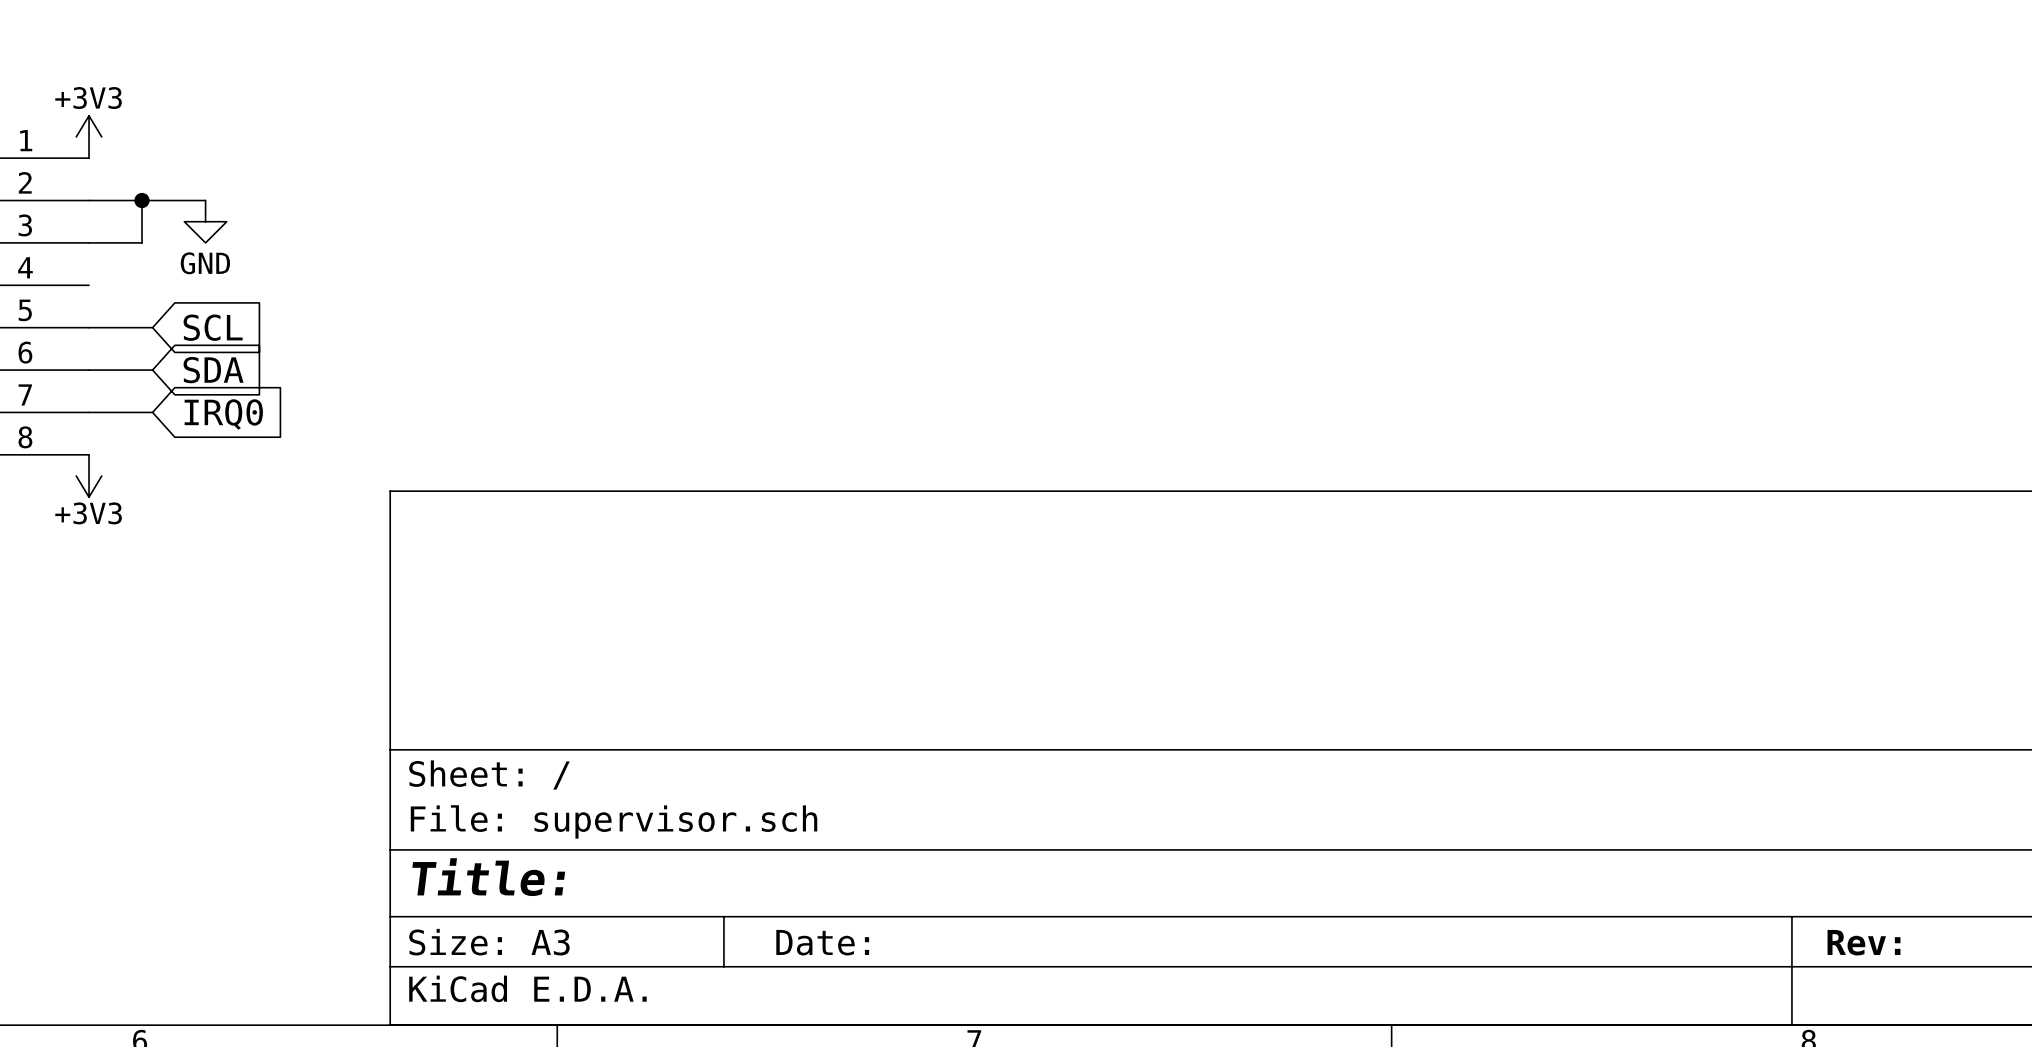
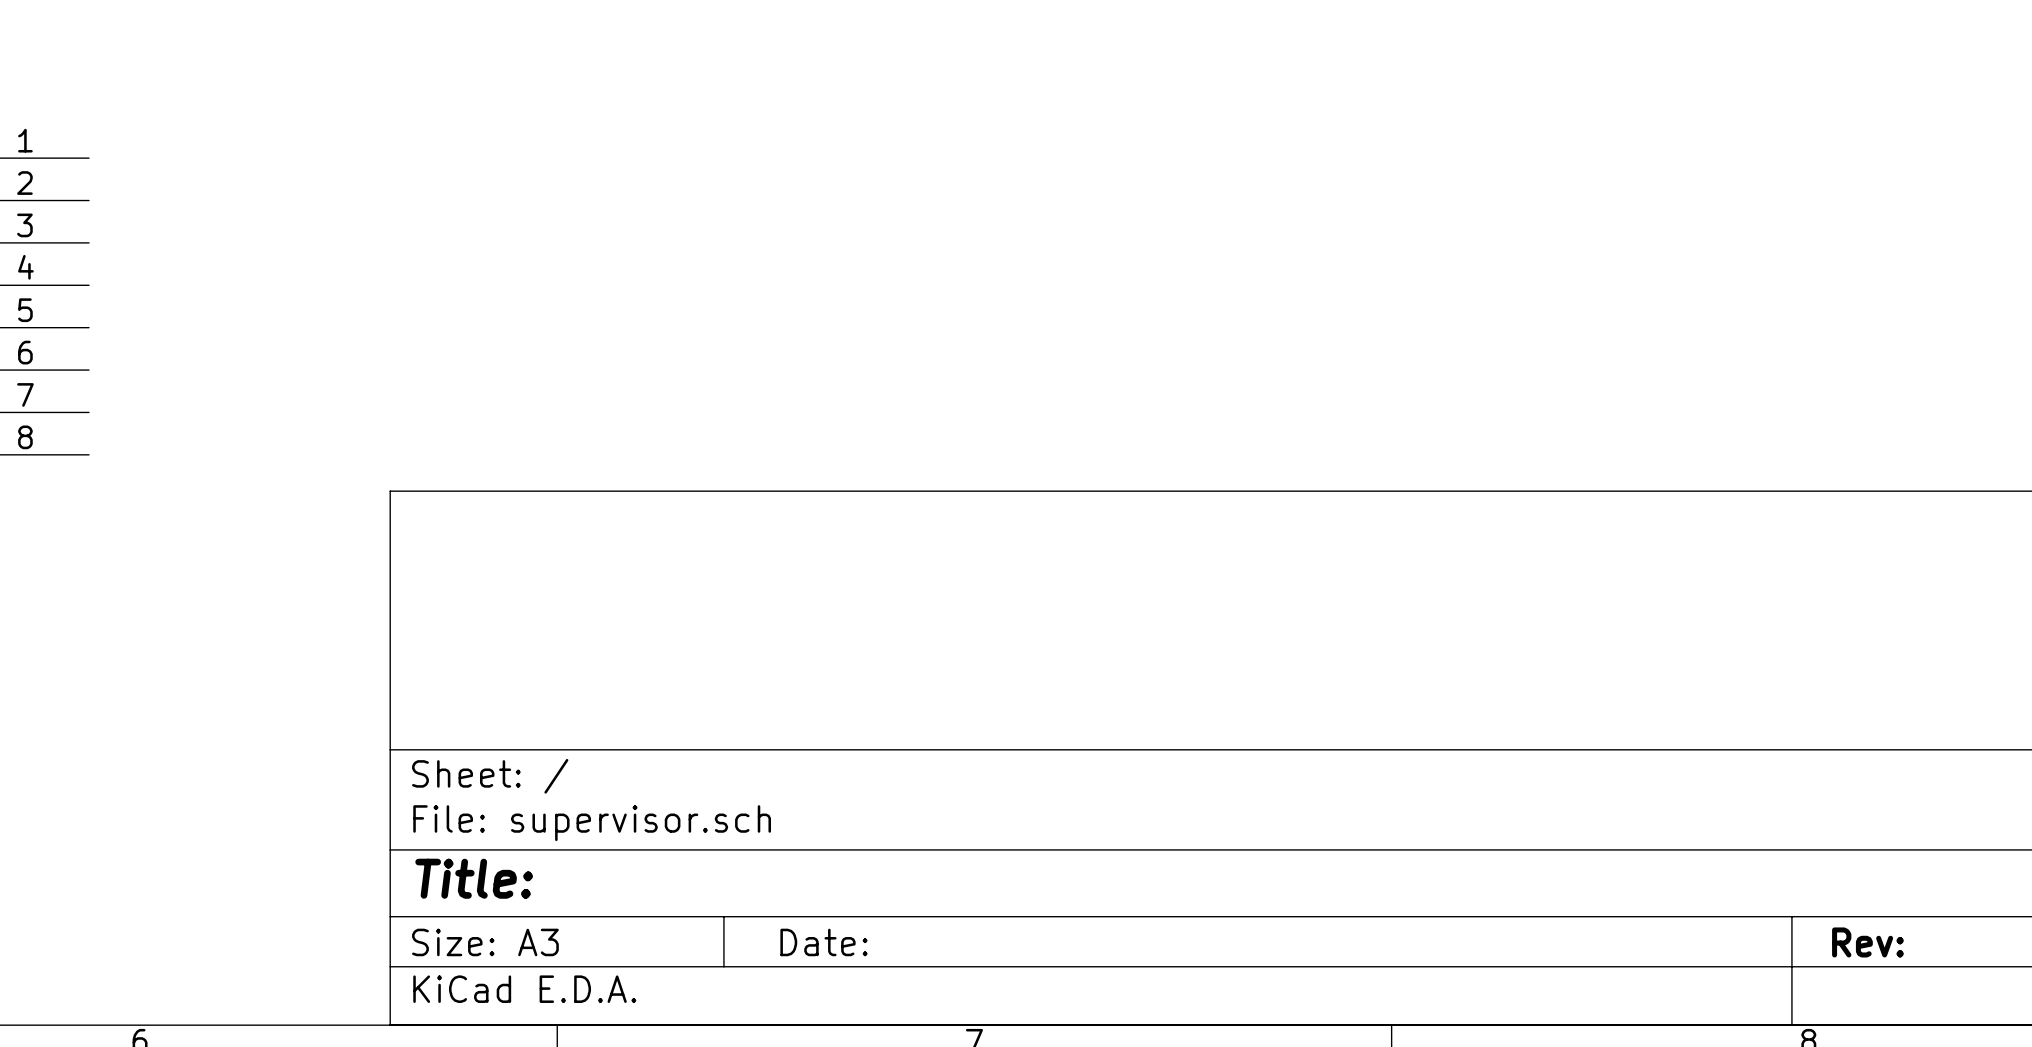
power symbol: +3V3 (89, 136) -> none
wire: (89, 200) (205, 200) -> none
wire: (141, 200) (141, 242) (89, 242) -> none
junction: (141, 200) -> none
power symbol: GND (205, 221) -> none
wire: (89, 327) (152, 327) -> none
global label: SCL (213, 327) -> none
wire: (89, 370) (152, 370) -> none
global label: SDA (213, 370) -> none
wire: (89, 412) (152, 412) -> none
global label: IRQ0 (223, 414) -> none
power symbol: +3V3 (89, 476) -> none

